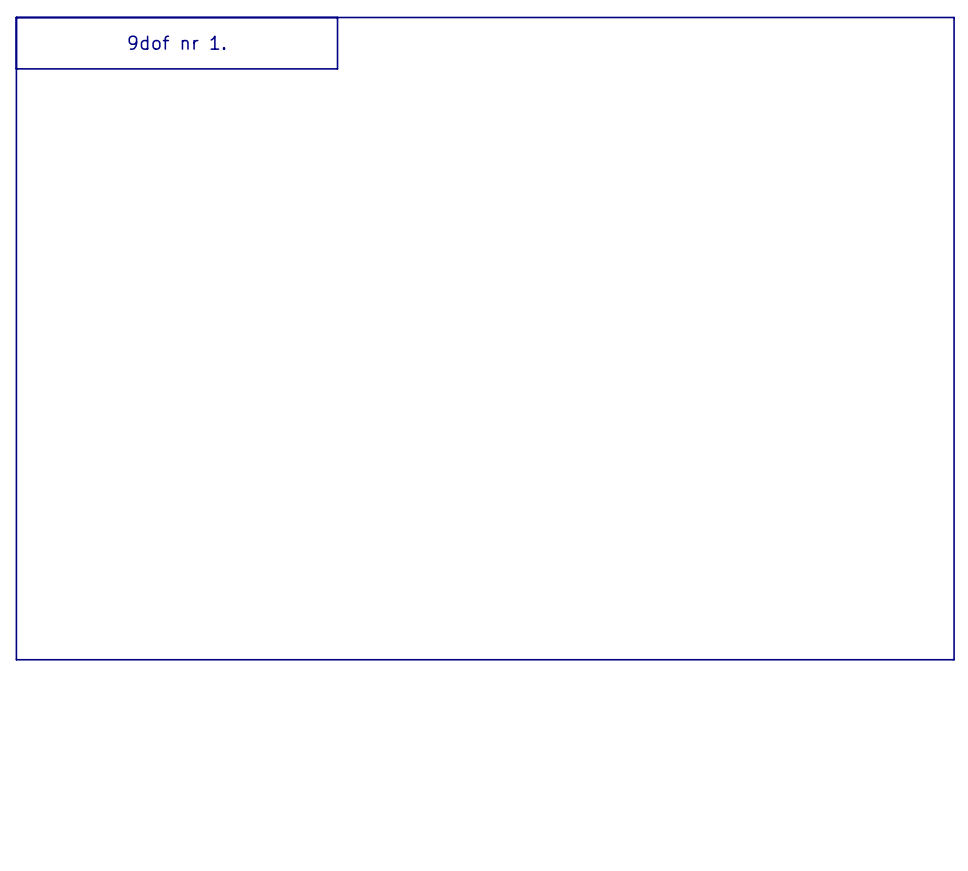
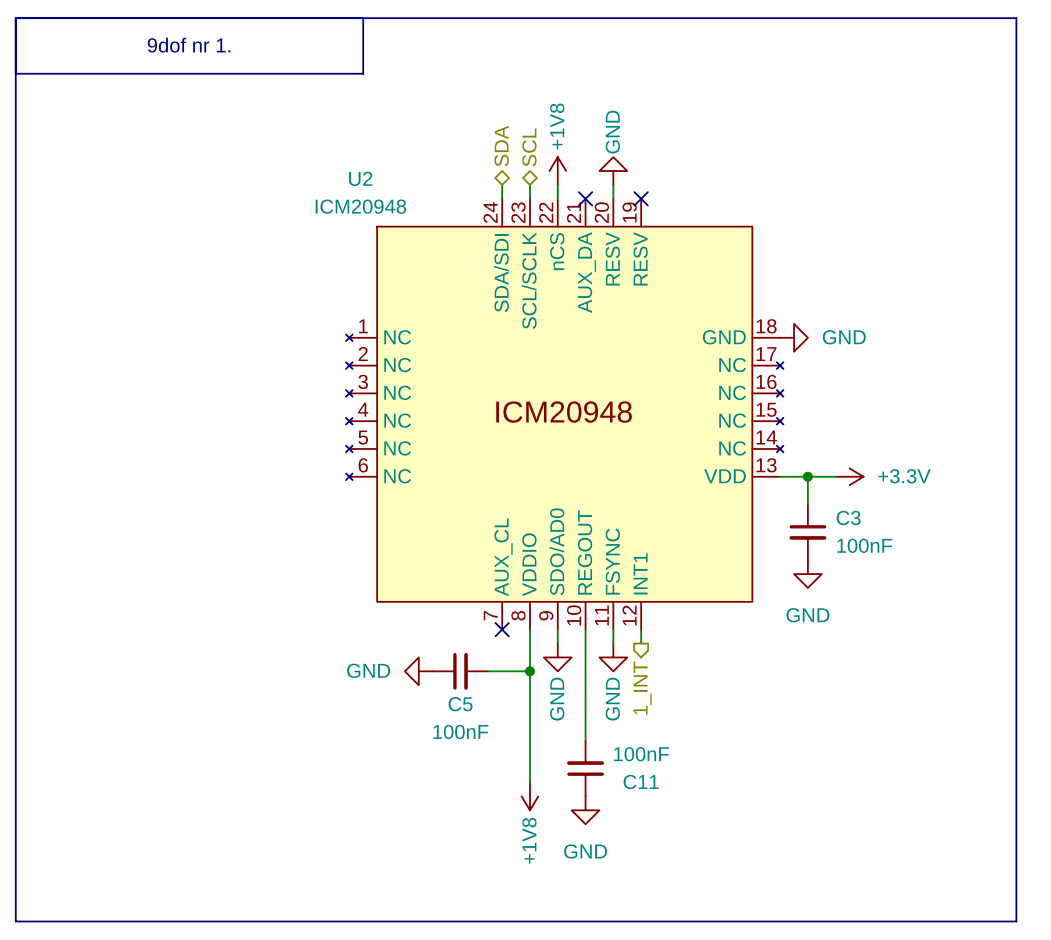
line: (941, 17) (954, 17) (954, 659) (16, 659) -> (1016, 18) (1016, 921) (15, 921) (15, 713)
hierarchical label: none -> SDA (501, 146)
hierarchical label: none -> SCL (529, 147)
power symbol: none -> +1V8 (557, 171)
power symbol: none -> GND (613, 171)
wire: none -> (502, 184) (502, 198)
wire: none -> (529, 184) (529, 198)
wire: none -> (557, 184) (557, 198)
wire: none -> (613, 184) (613, 198)
no-connect mark: none -> (585, 198)
no-connect mark: none -> (641, 198)
power symbol: none -> GND (794, 337)
U2: none -> ICM20948 (564, 414)
wire: none -> (780, 476) (835, 476)
wire: none -> (807, 476) (807, 504)
junction: none -> (807, 476)
power symbol: none -> +3.3V (849, 476)
C3: none -> 100nF (807, 532)
power symbol: none -> GND (807, 574)
no-connect mark: none -> (502, 629)
wire: none -> (529, 629) (529, 782)
wire: none -> (557, 629) (557, 643)
wire: none -> (585, 629) (585, 740)
wire: none -> (613, 629) (613, 643)
wire: none -> (641, 629) (641, 643)
power symbol: none -> GND (557, 657)
power symbol: none -> GND (613, 657)
power symbol: none -> GND (418, 671)
C5: none -> 100nF (460, 671)
wire: none -> (488, 671) (529, 671)
junction: none -> (529, 671)
hierarchical label: none -> 1_INT (642, 688)
C11: none -> 100nF (585, 768)
power symbol: none -> +1V8 (529, 796)
power symbol: none -> GND (585, 810)

